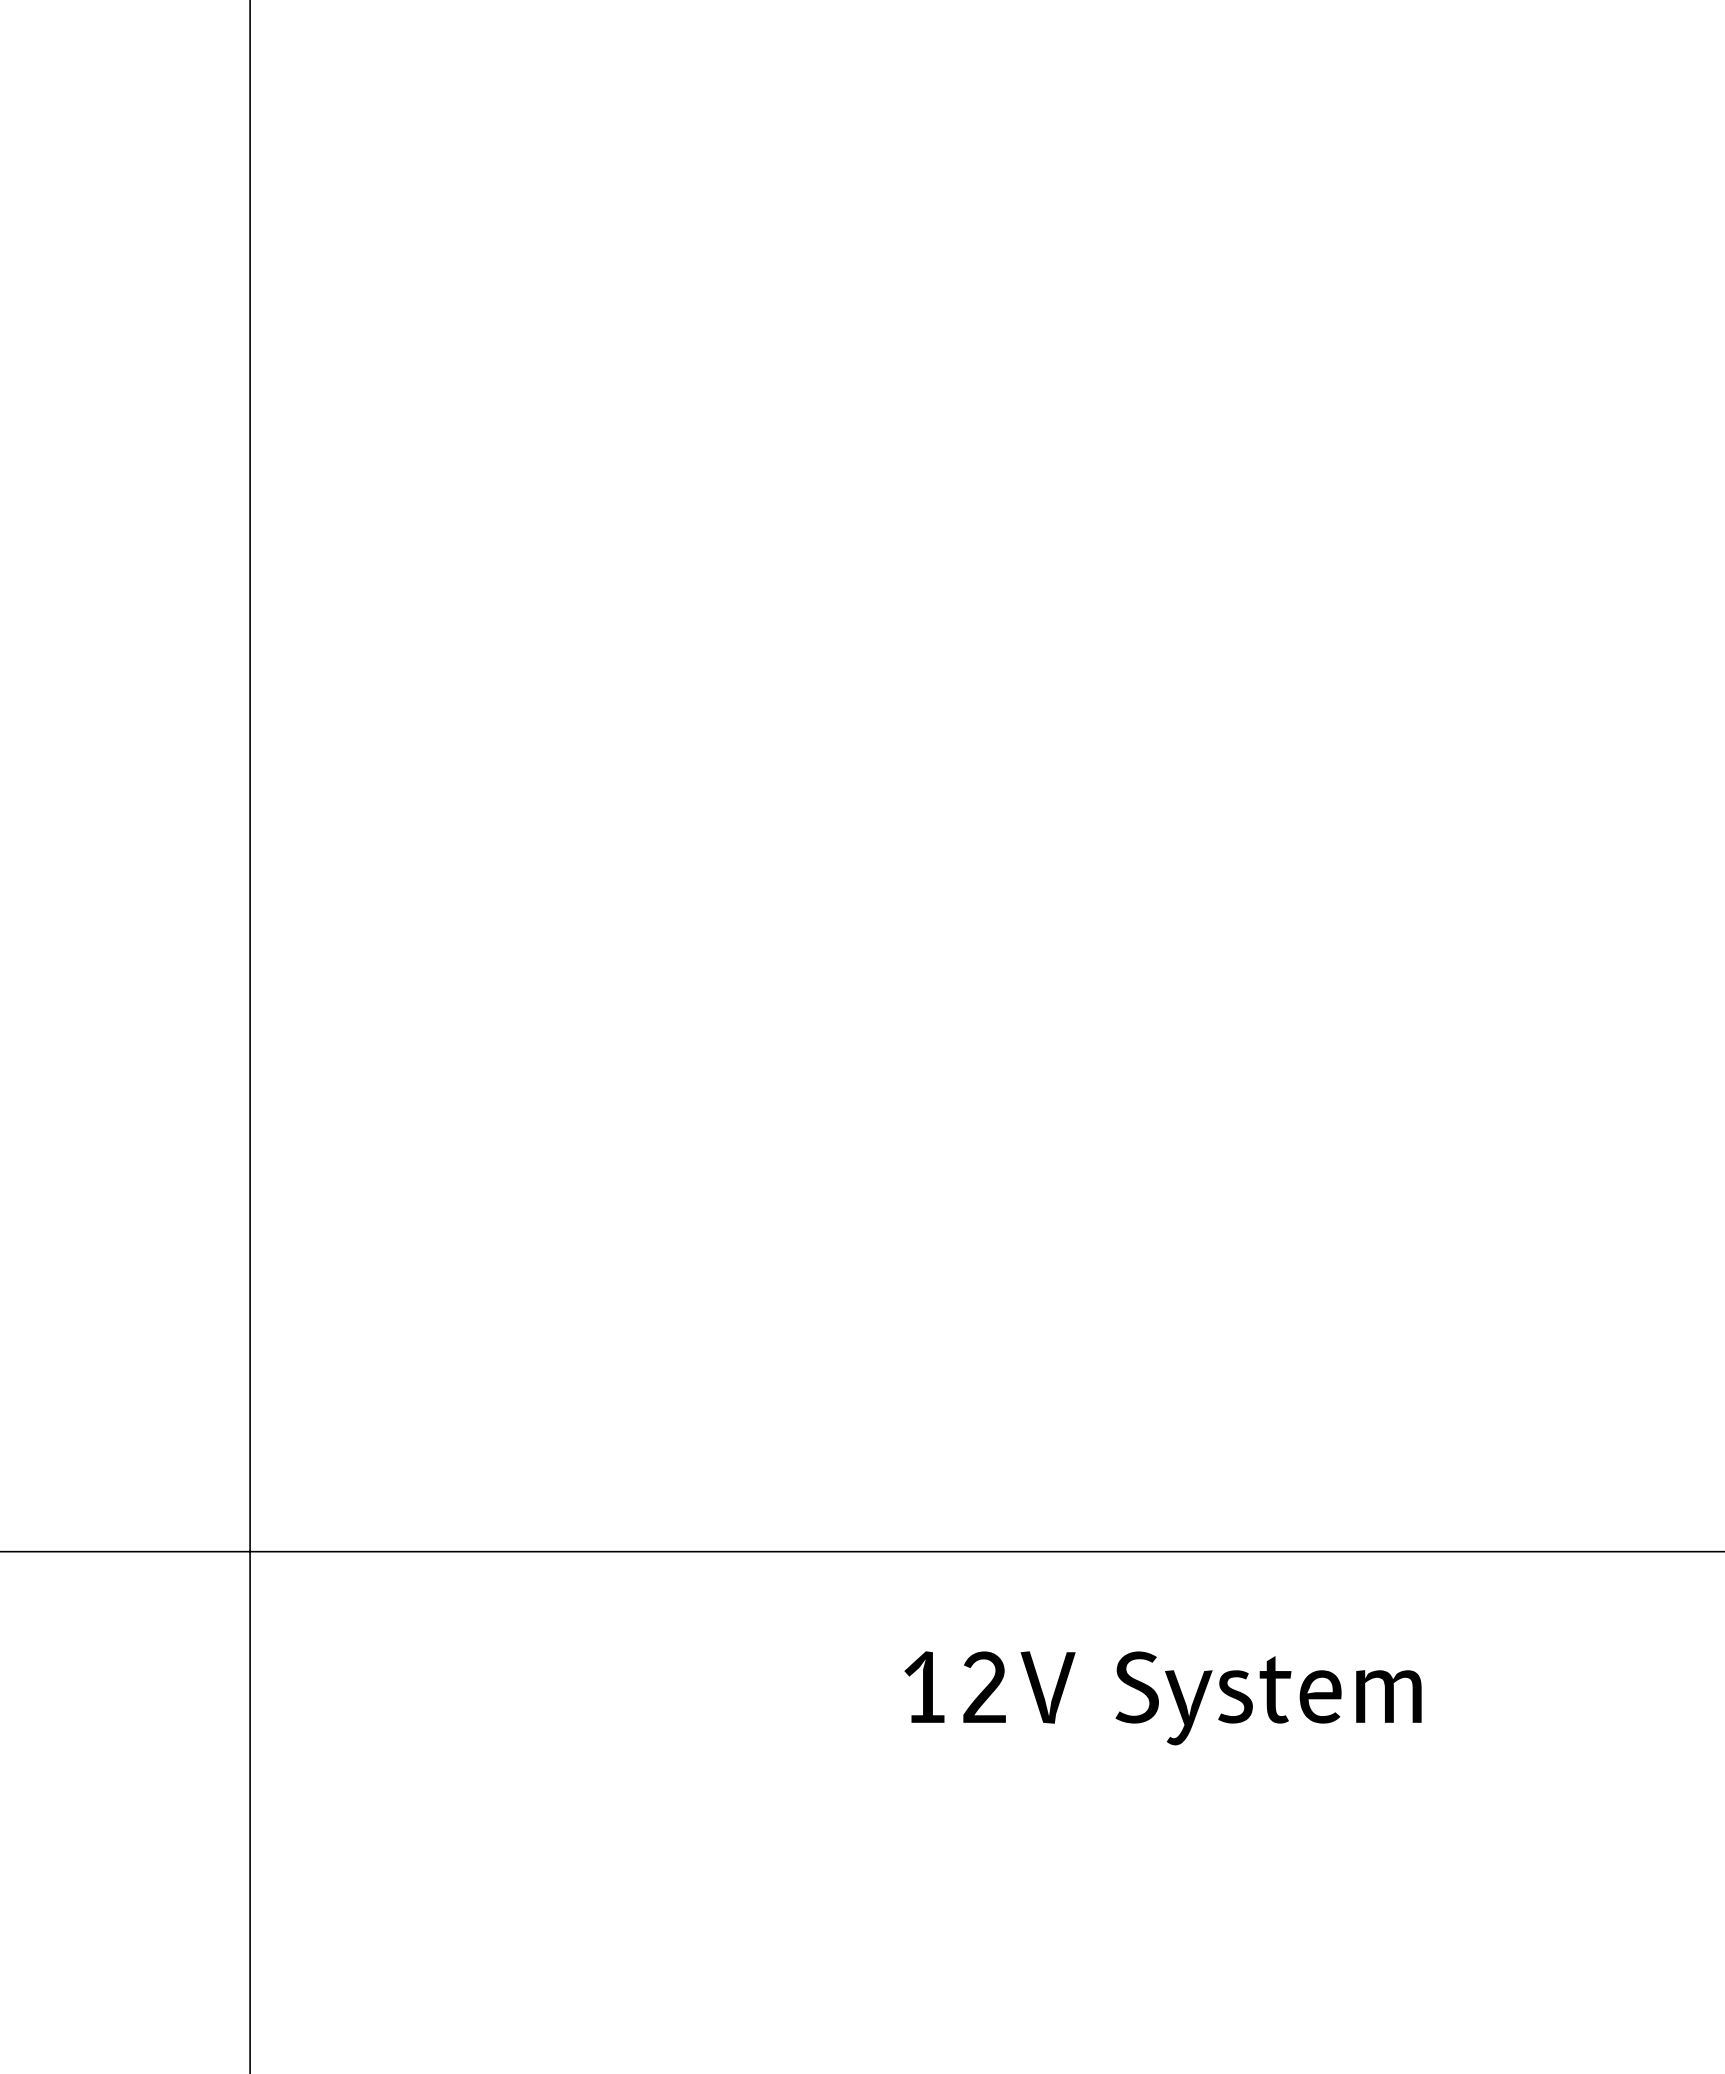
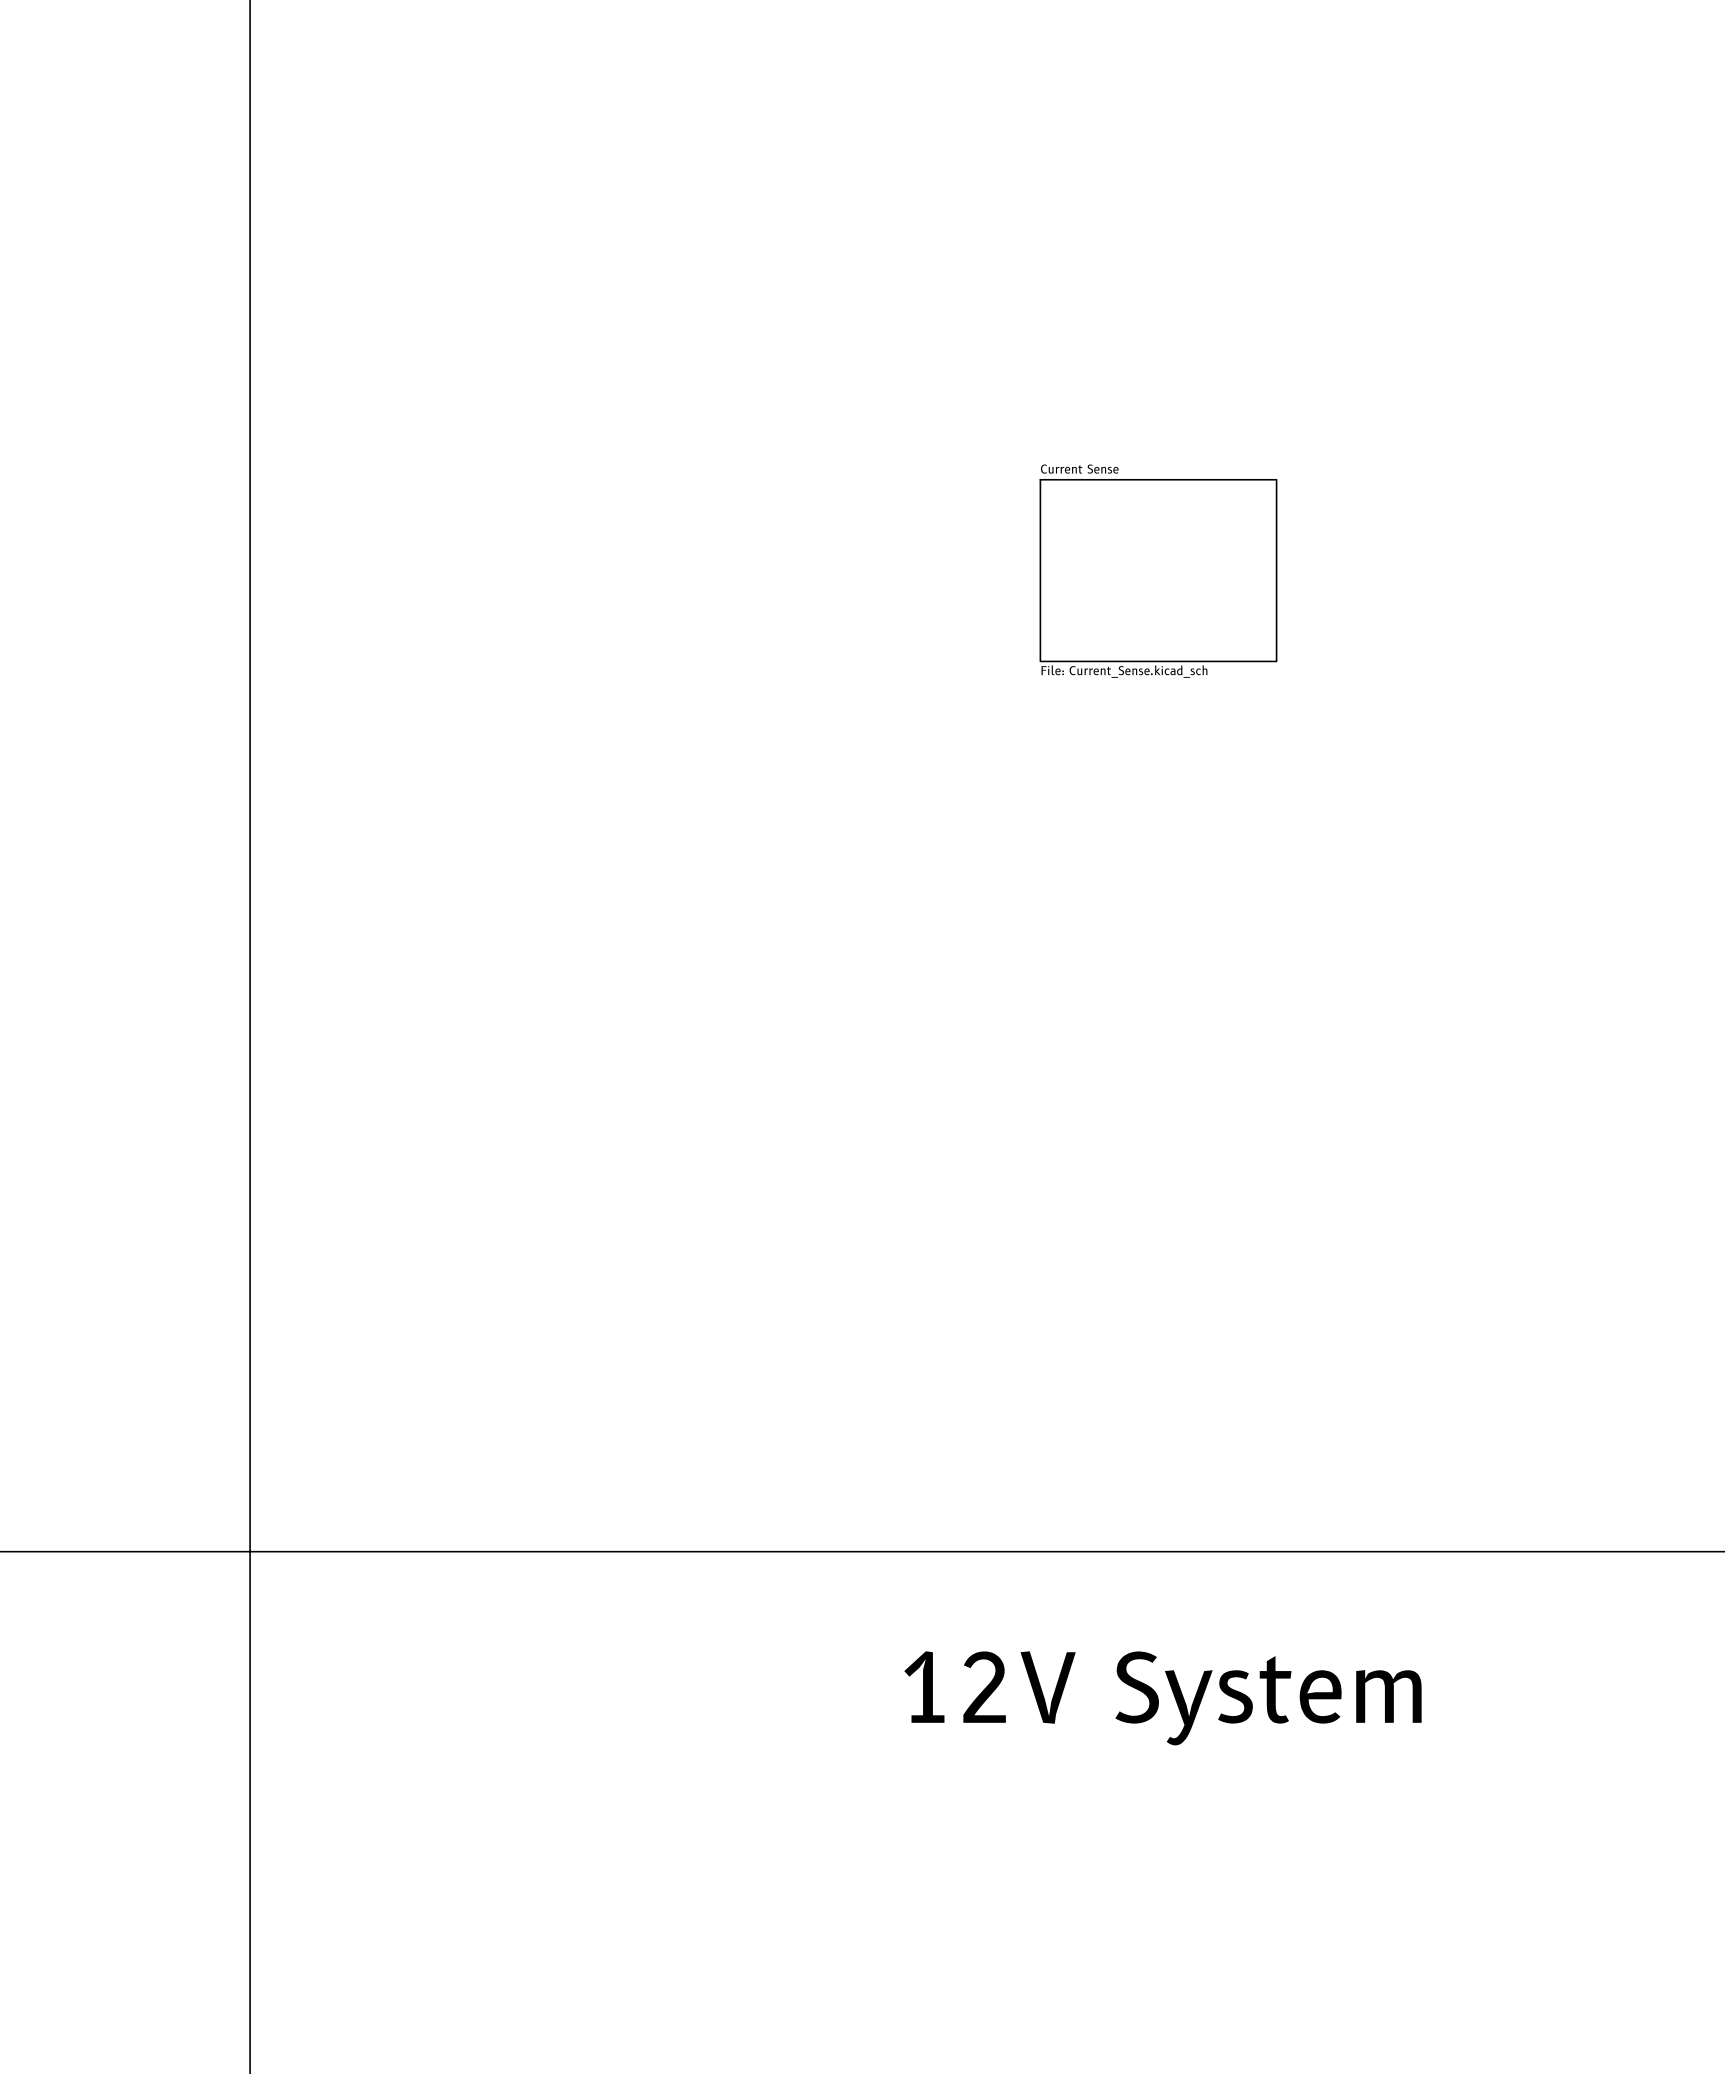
sheet Current Sense: none -> File: Current_Sense.kicad_sch (1158, 570)

